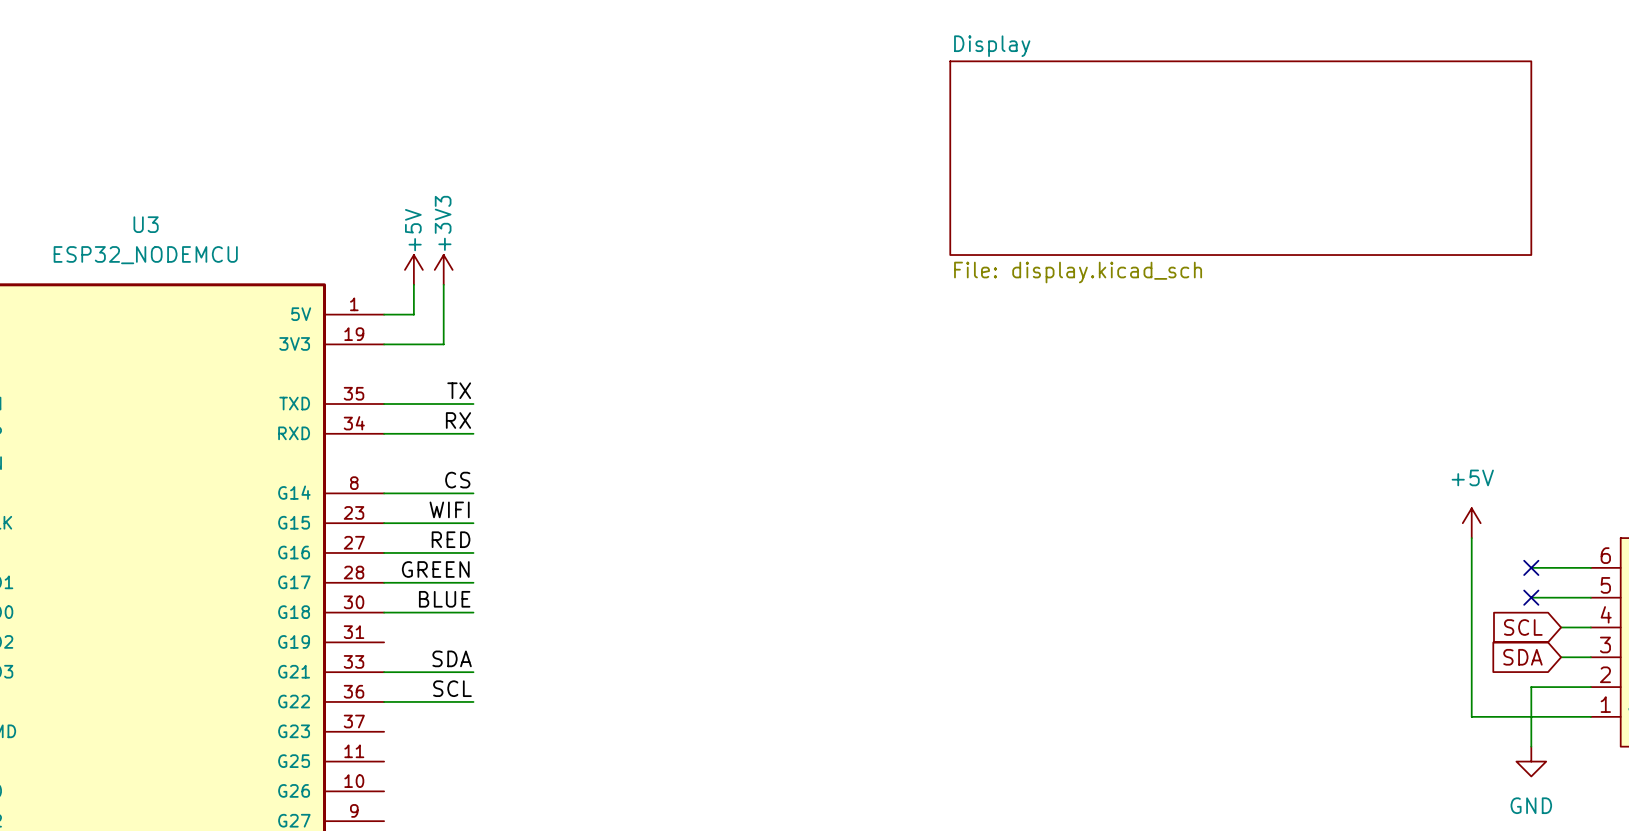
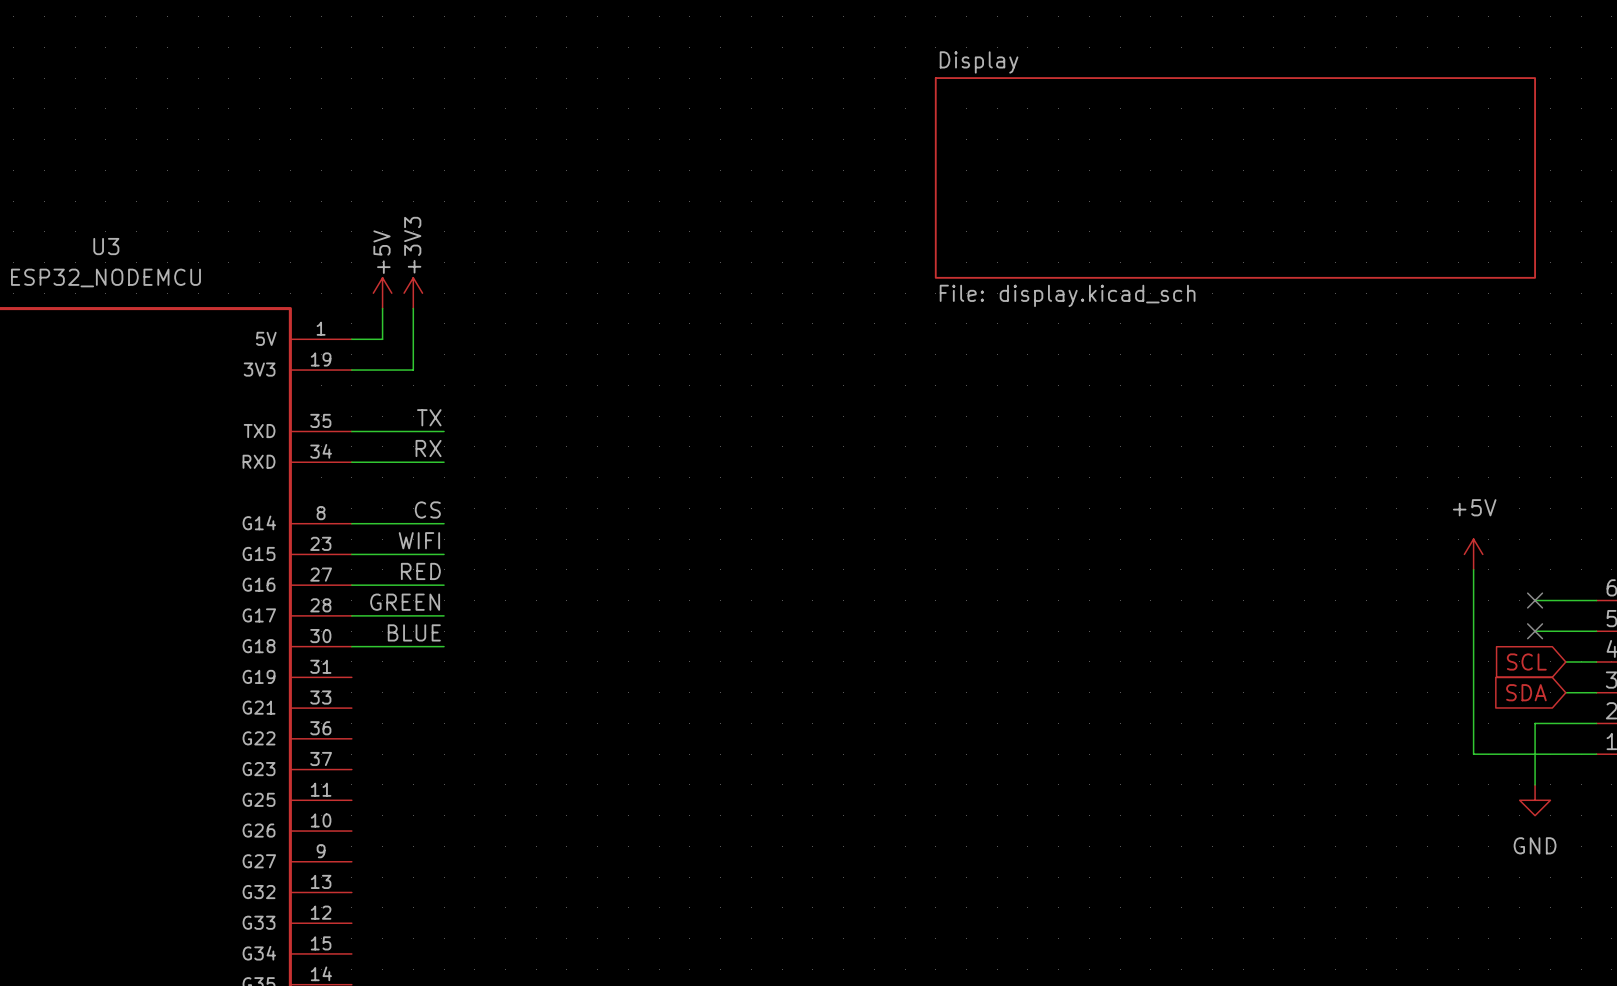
label: SDA (452, 658) -> none
wire: (384, 672) (473, 672) -> none
label: SCL (452, 688) -> none
wire: (384, 701) (473, 701) -> none

